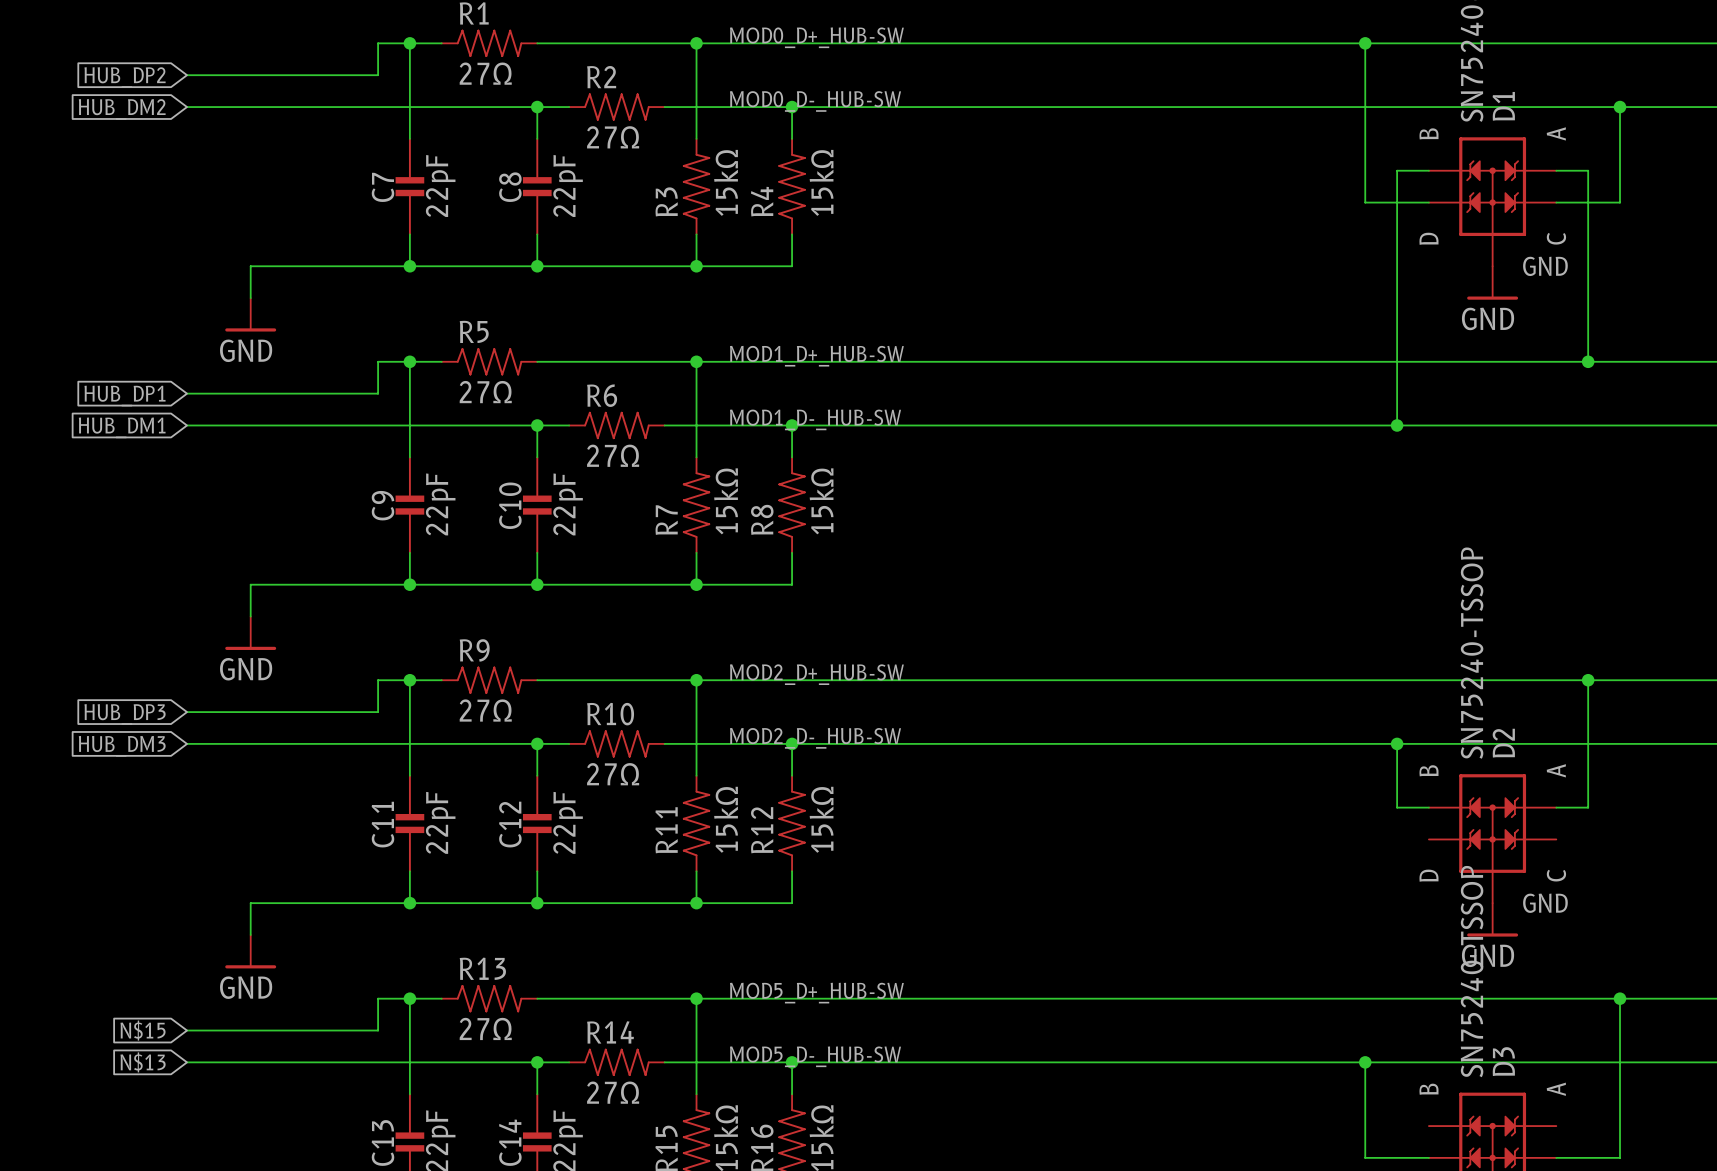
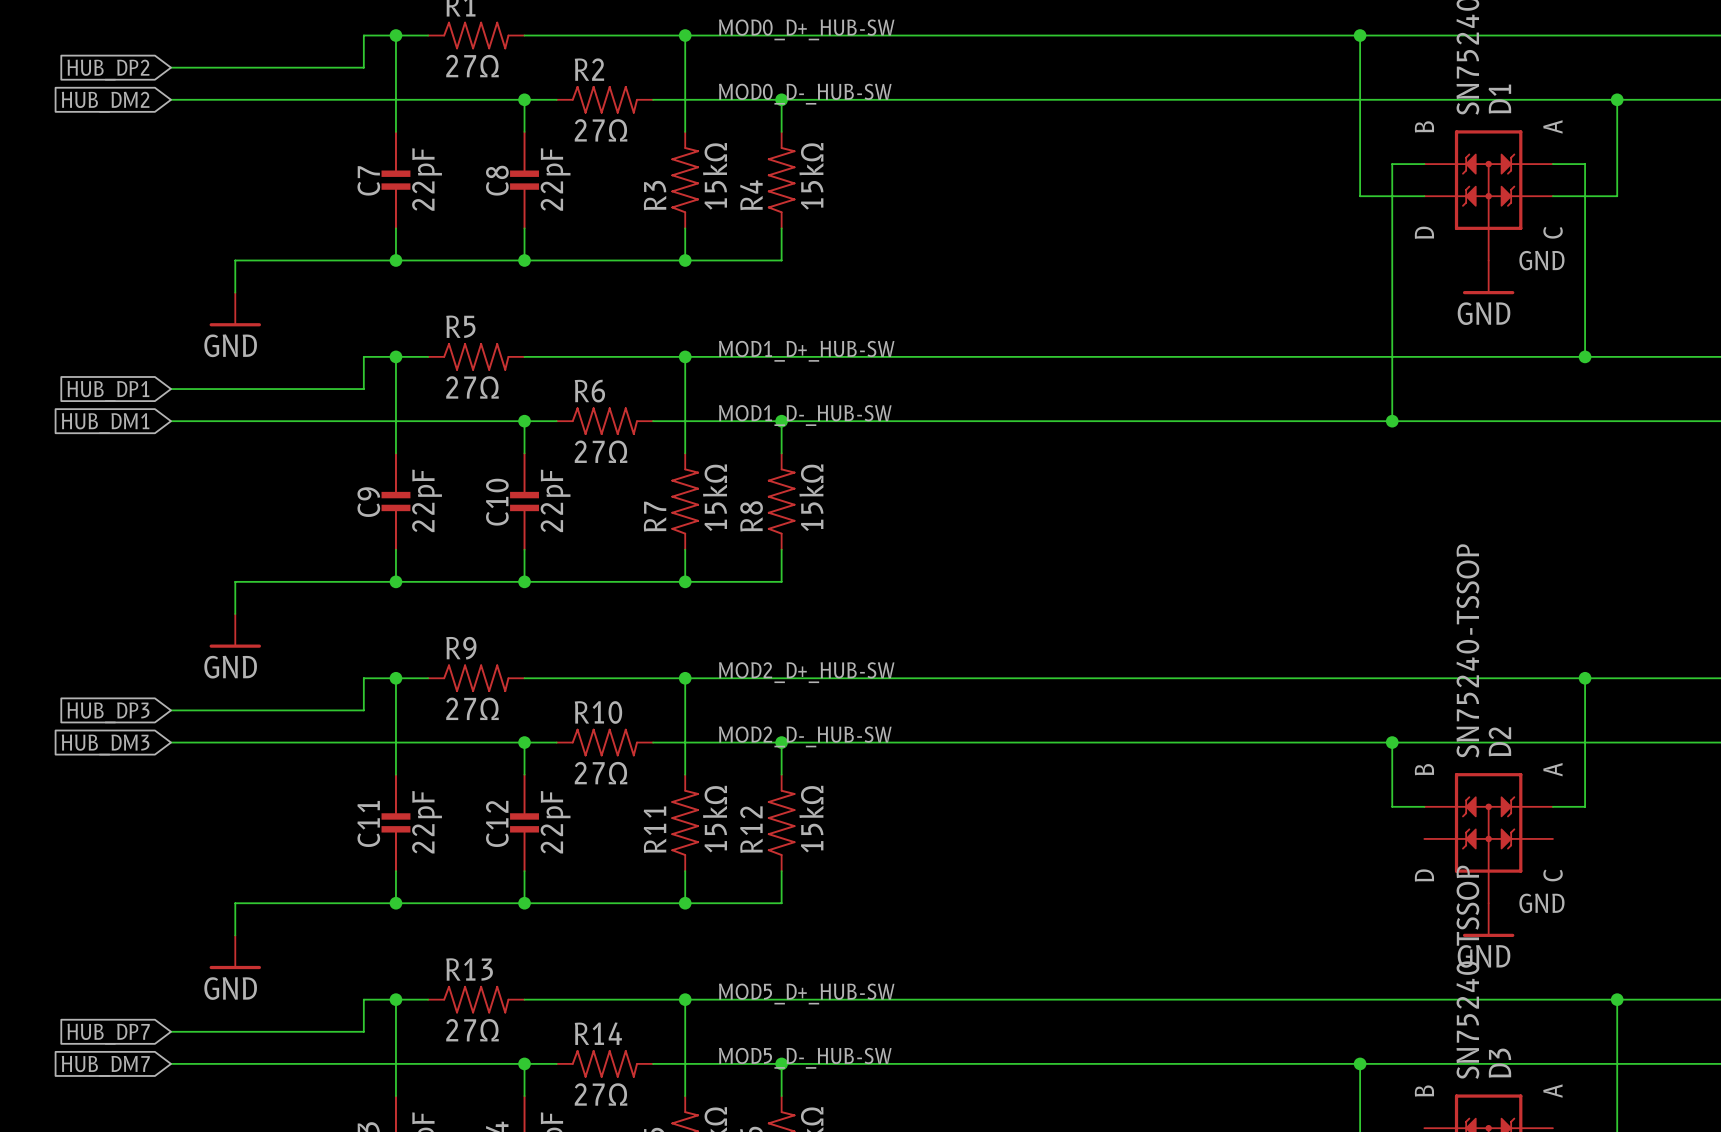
global label: N$15 (143, 1030) -> HUB_DP7 (108, 1034)
global label: N$13 (143, 1062) -> HUB_DM7 (105, 1066)

